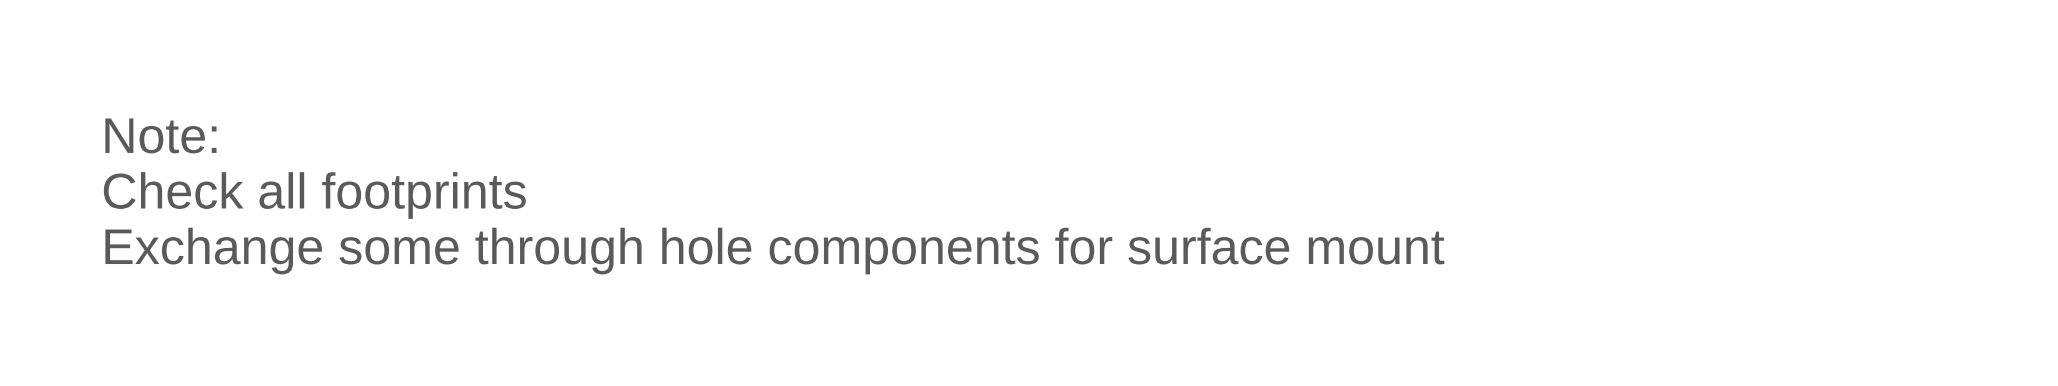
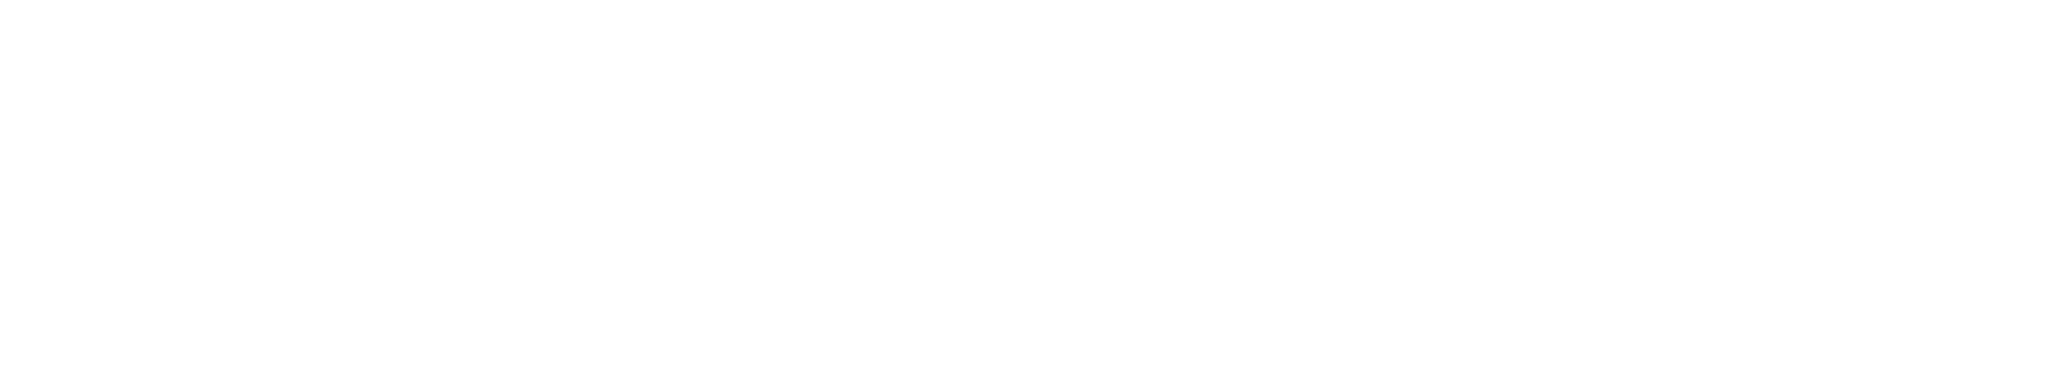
text: Note: (160, 135) -> none
text: Check all footprints (314, 195) -> none
text: Exchange some through hole components for surface mount (774, 251) -> none

